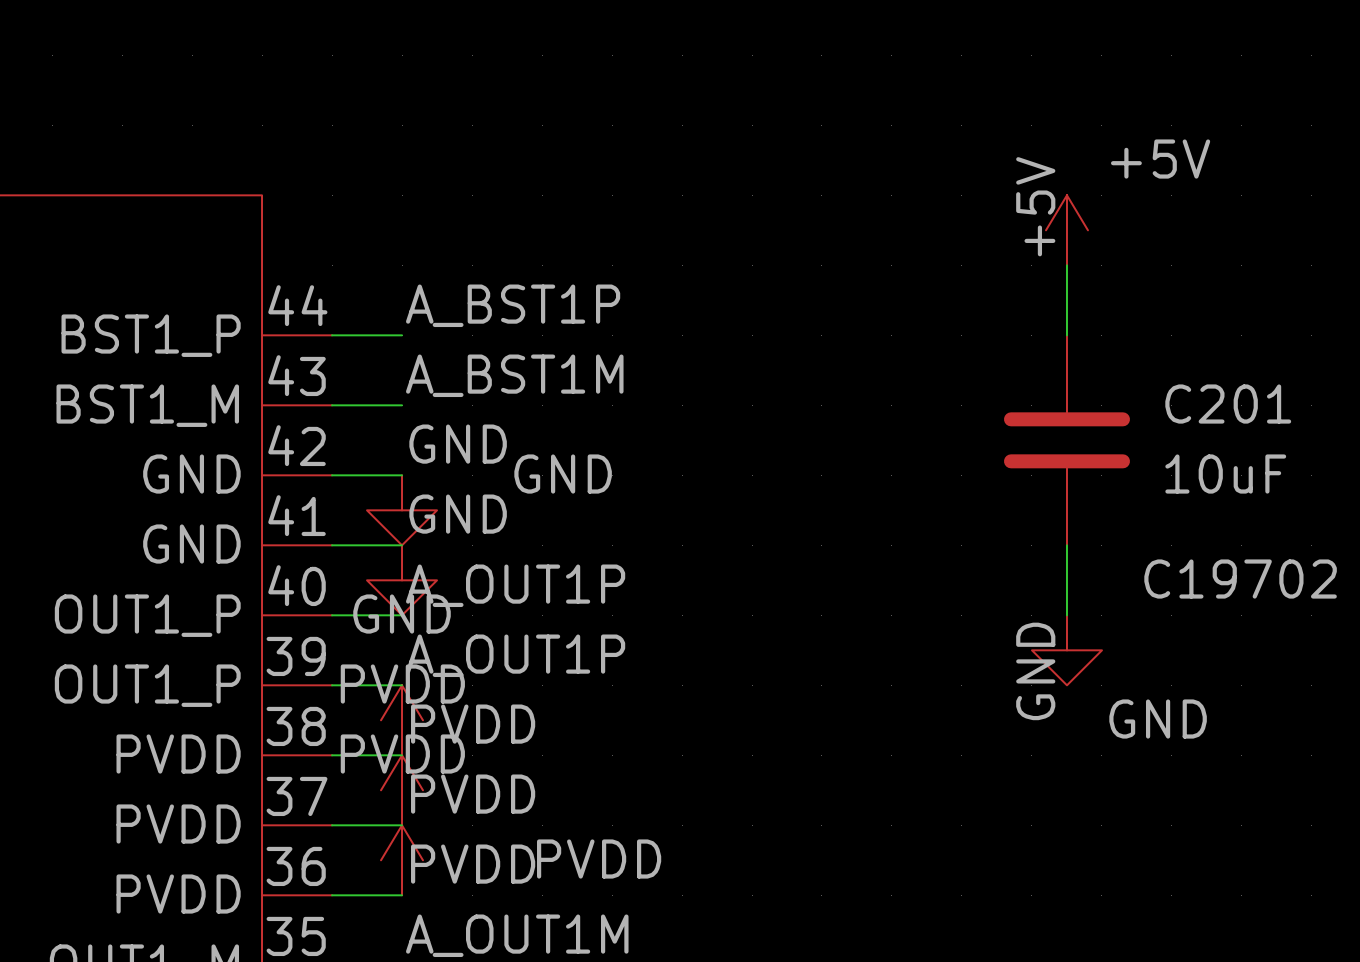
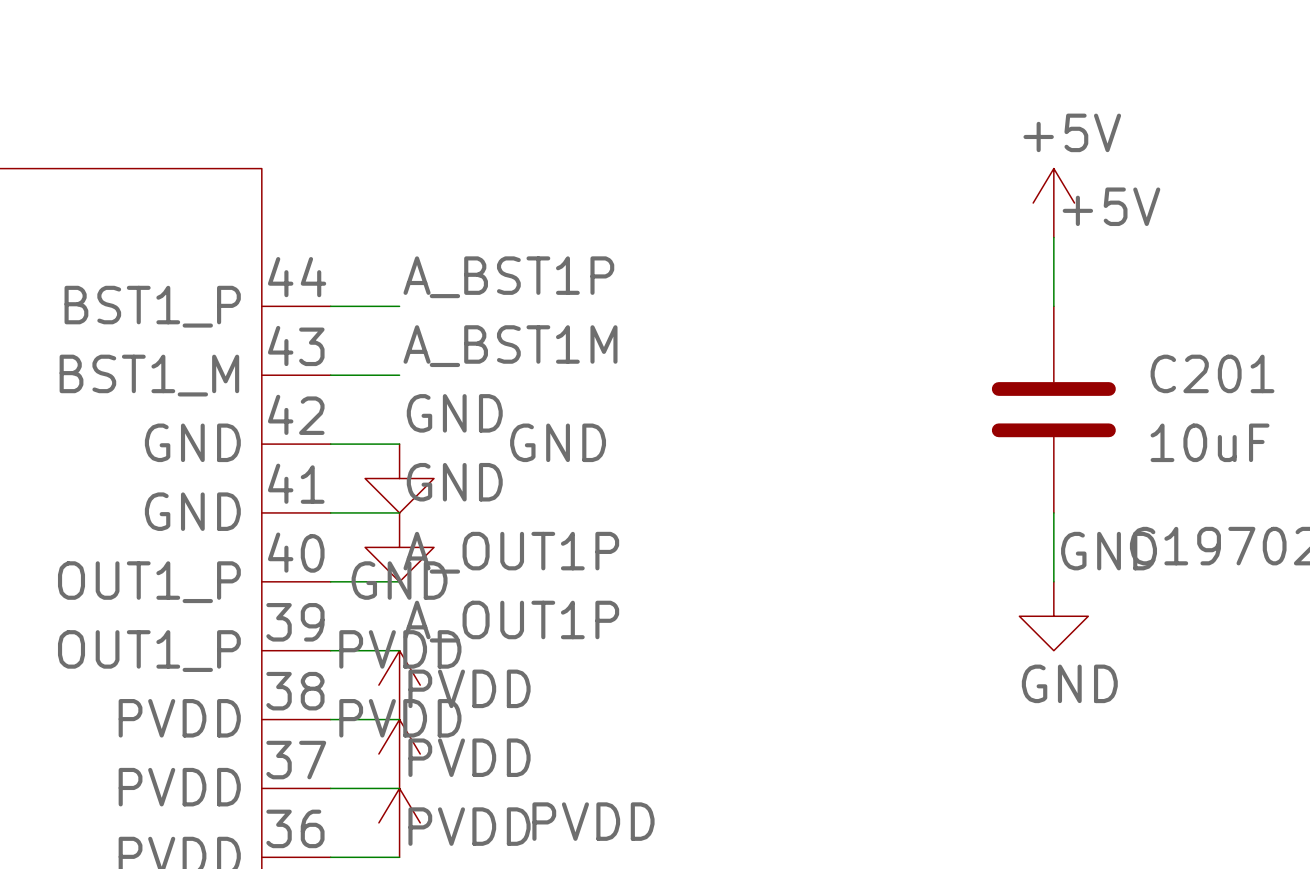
power symbol text position: +5V (1160, 159) -> +5V (1072, 132)
label rotation: 0° (1035, 206) -> 90° clockwise (1111, 206)
label rotation: 0° (1035, 671) -> 90° clockwise (1109, 551)
label position: GND (1035, 671) -> GND (1109, 551)
power symbol text position: GND (1158, 719) -> GND (1069, 683)

